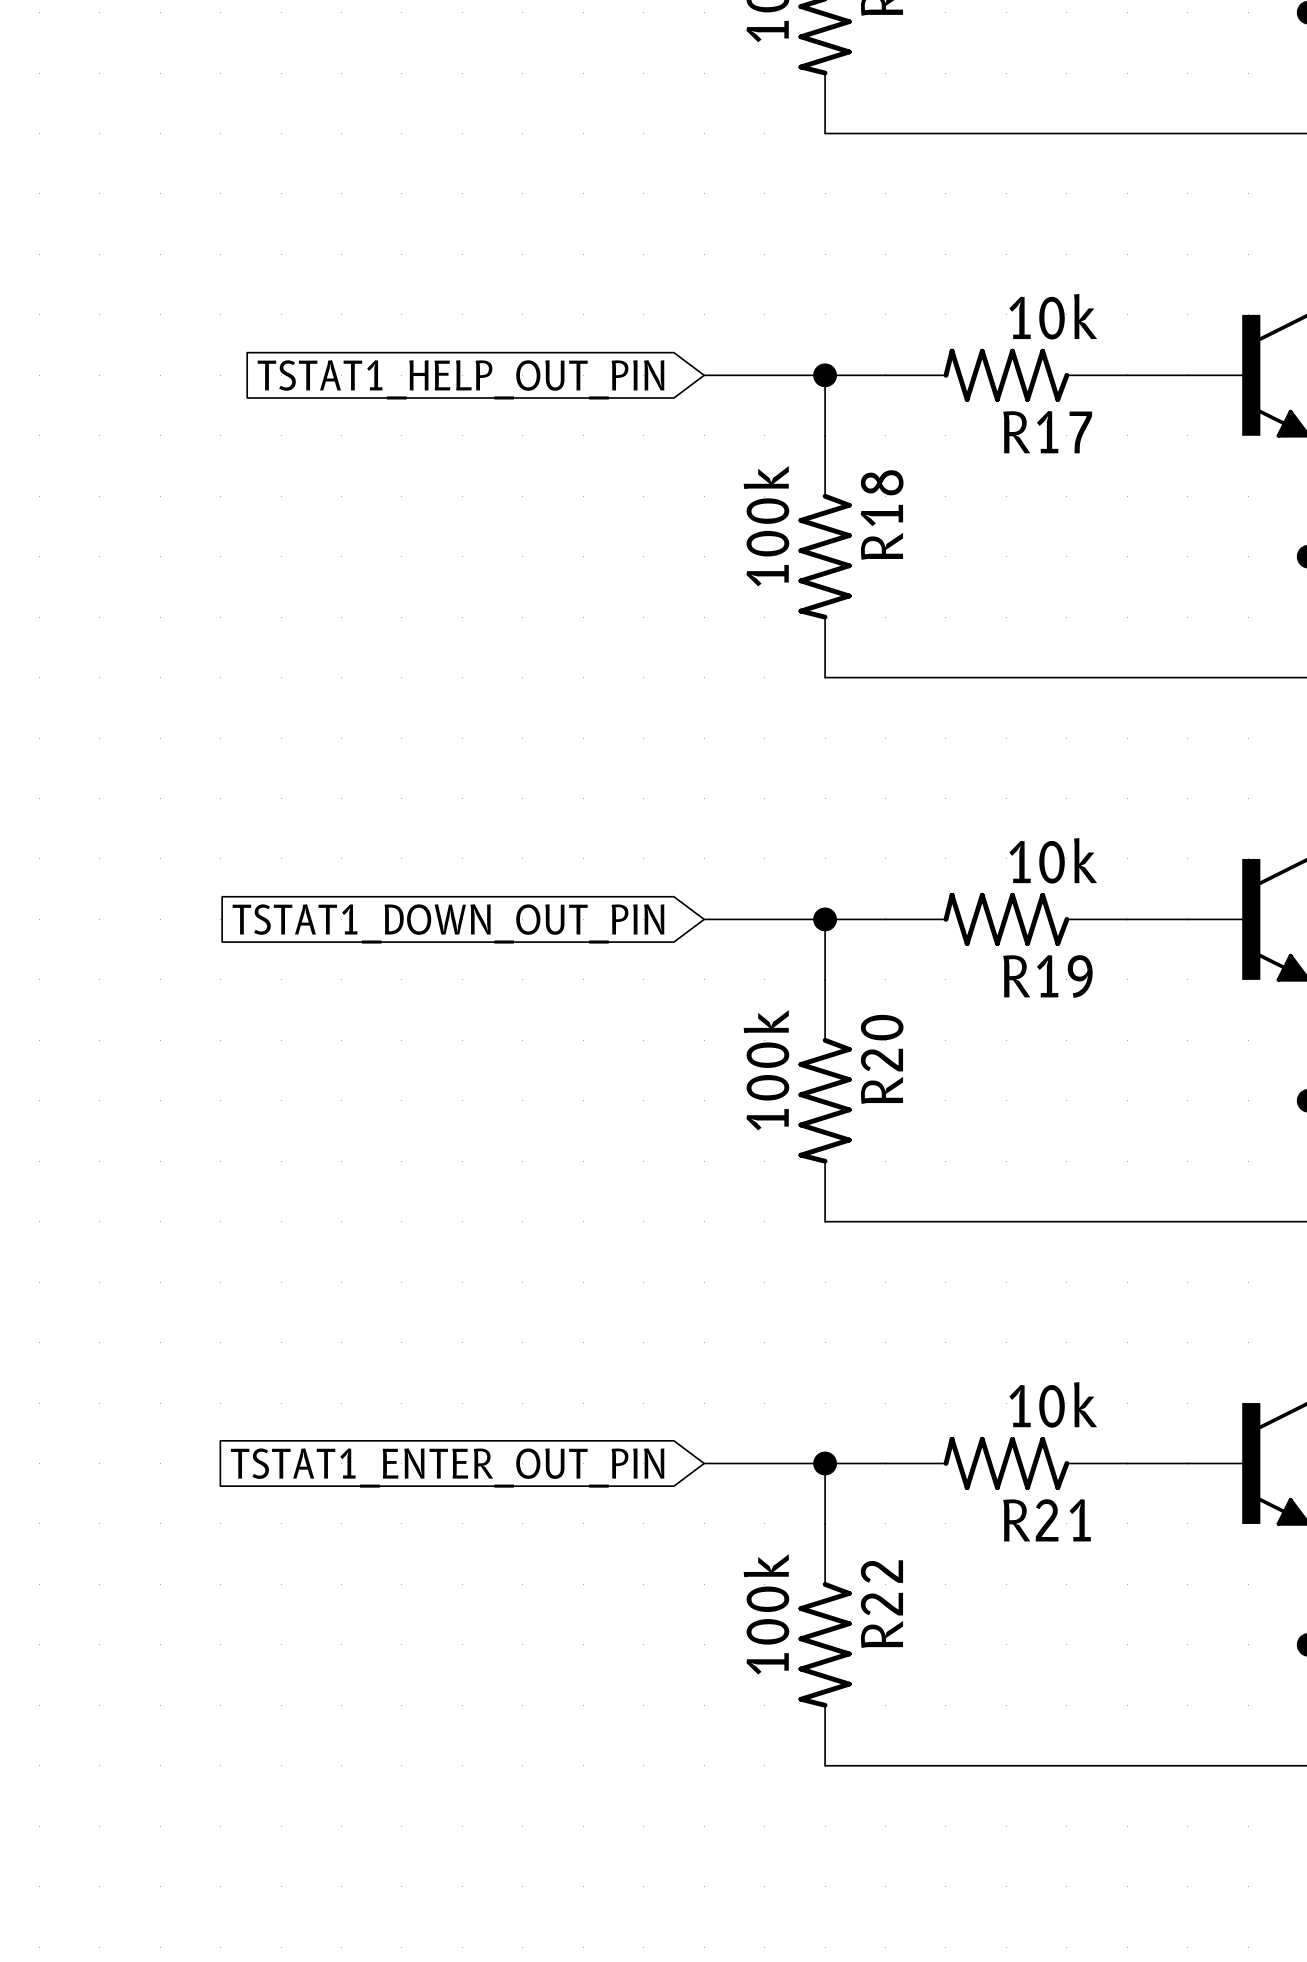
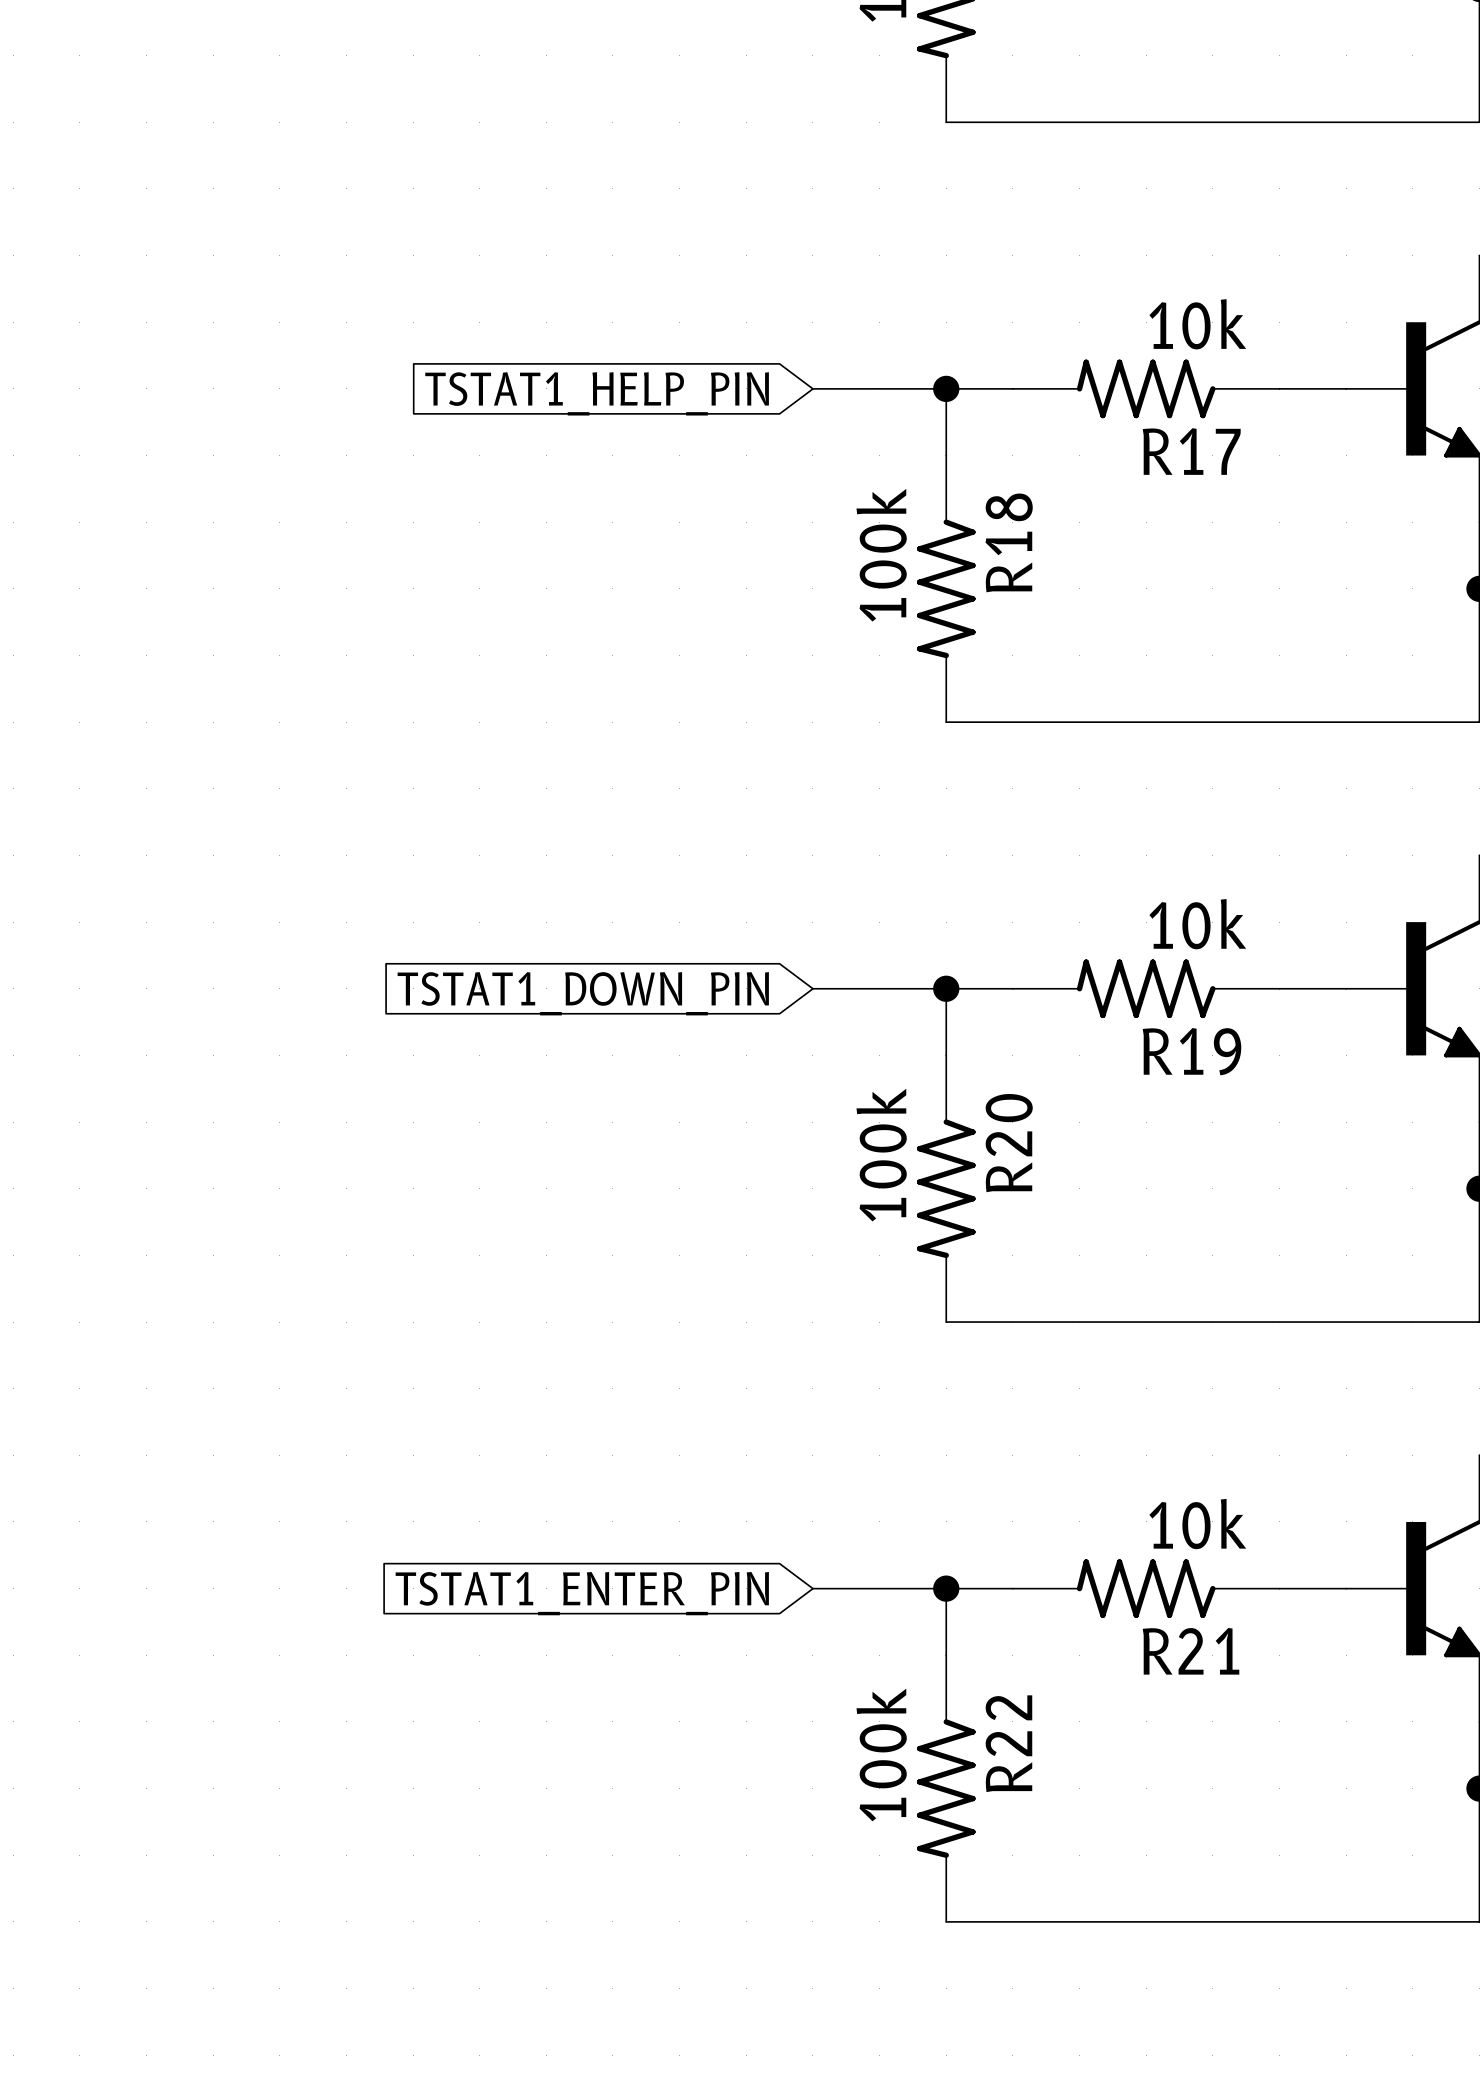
global label: TSTAT1_HELP_OUT_PIN (460, 379) -> TSTAT1_HELP_PIN (597, 393)
global label: TSTAT1_DOWN_OUT_PIN (448, 923) -> TSTAT1_DOWN_PIN (583, 993)
global label: TSTAT1_ENTER_OUT_PIN (447, 1468) -> TSTAT1_ENTER_PIN (582, 1593)

